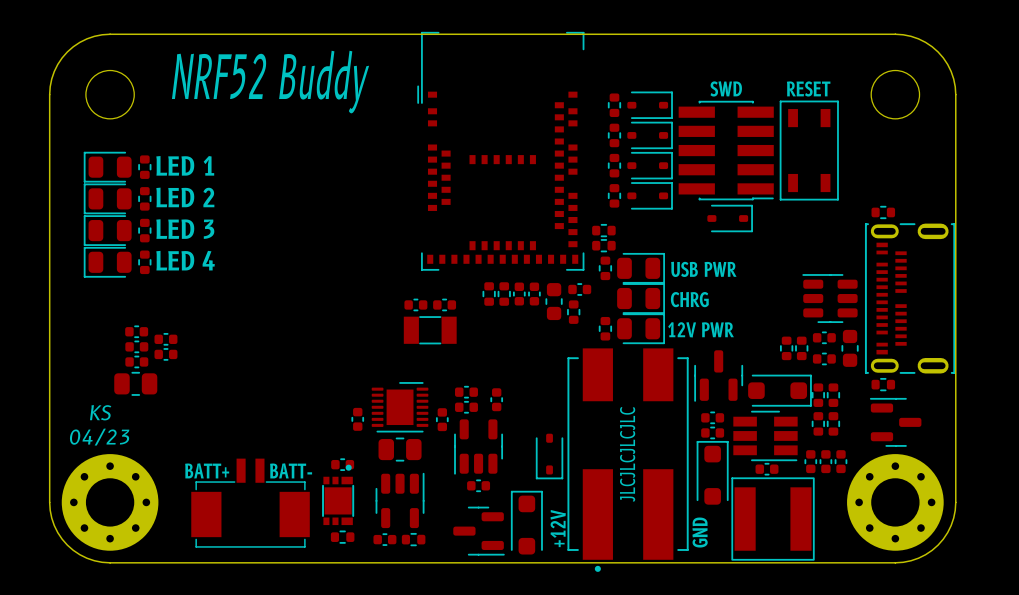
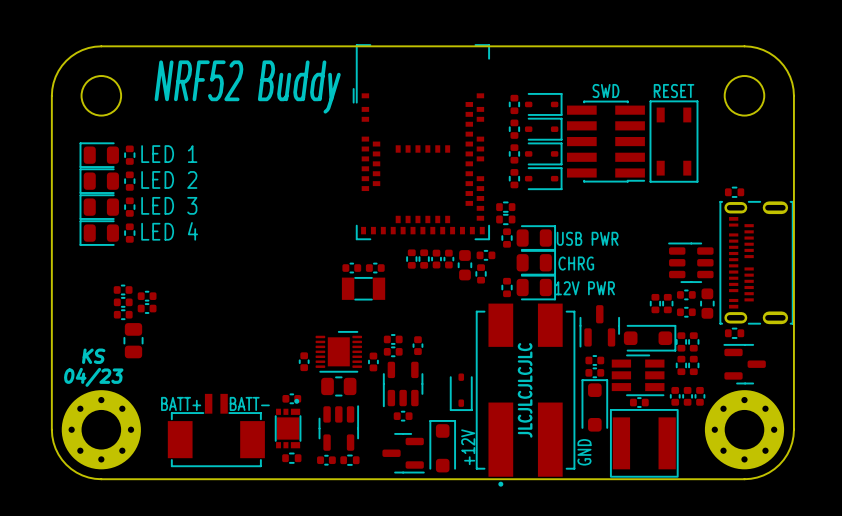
part: (730, 218) -> none
part rotation: 0° (135, 383) -> 90° clockwise (133, 340)

